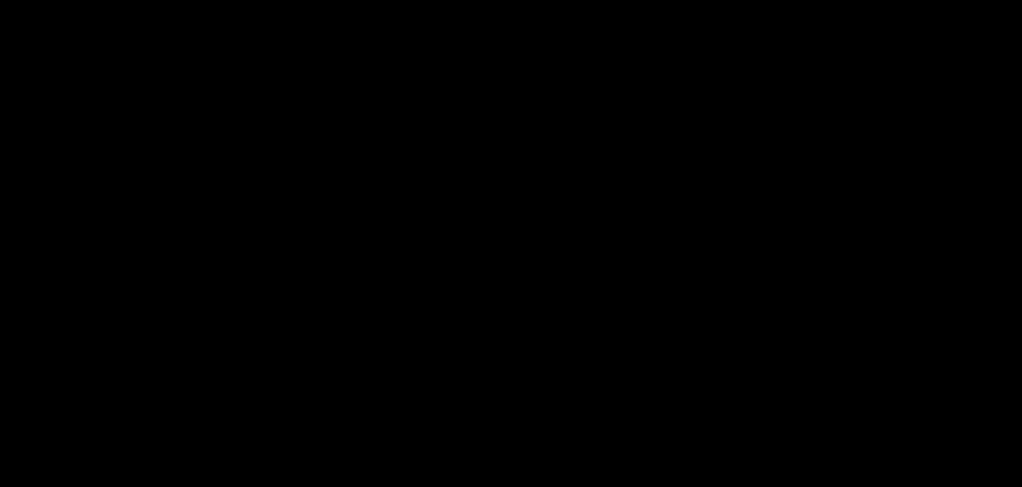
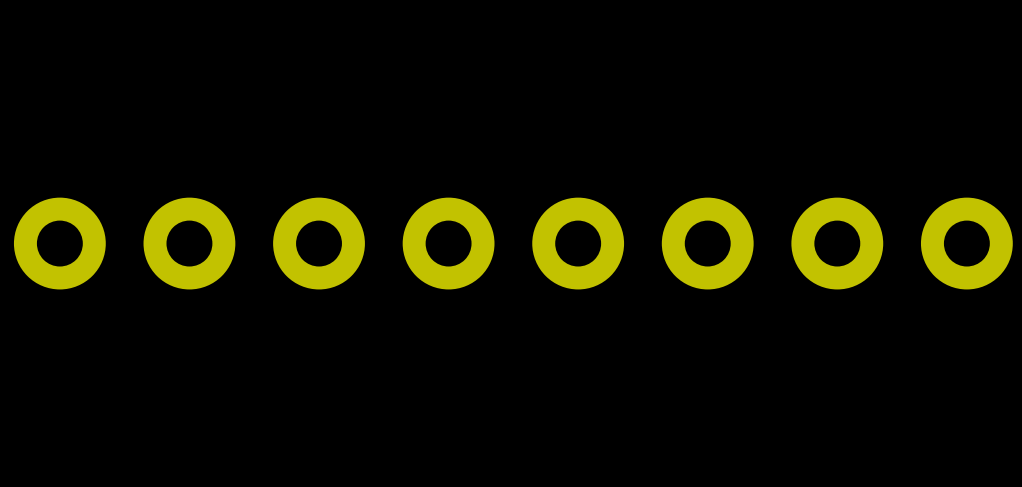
part: none -> (513, 243)

